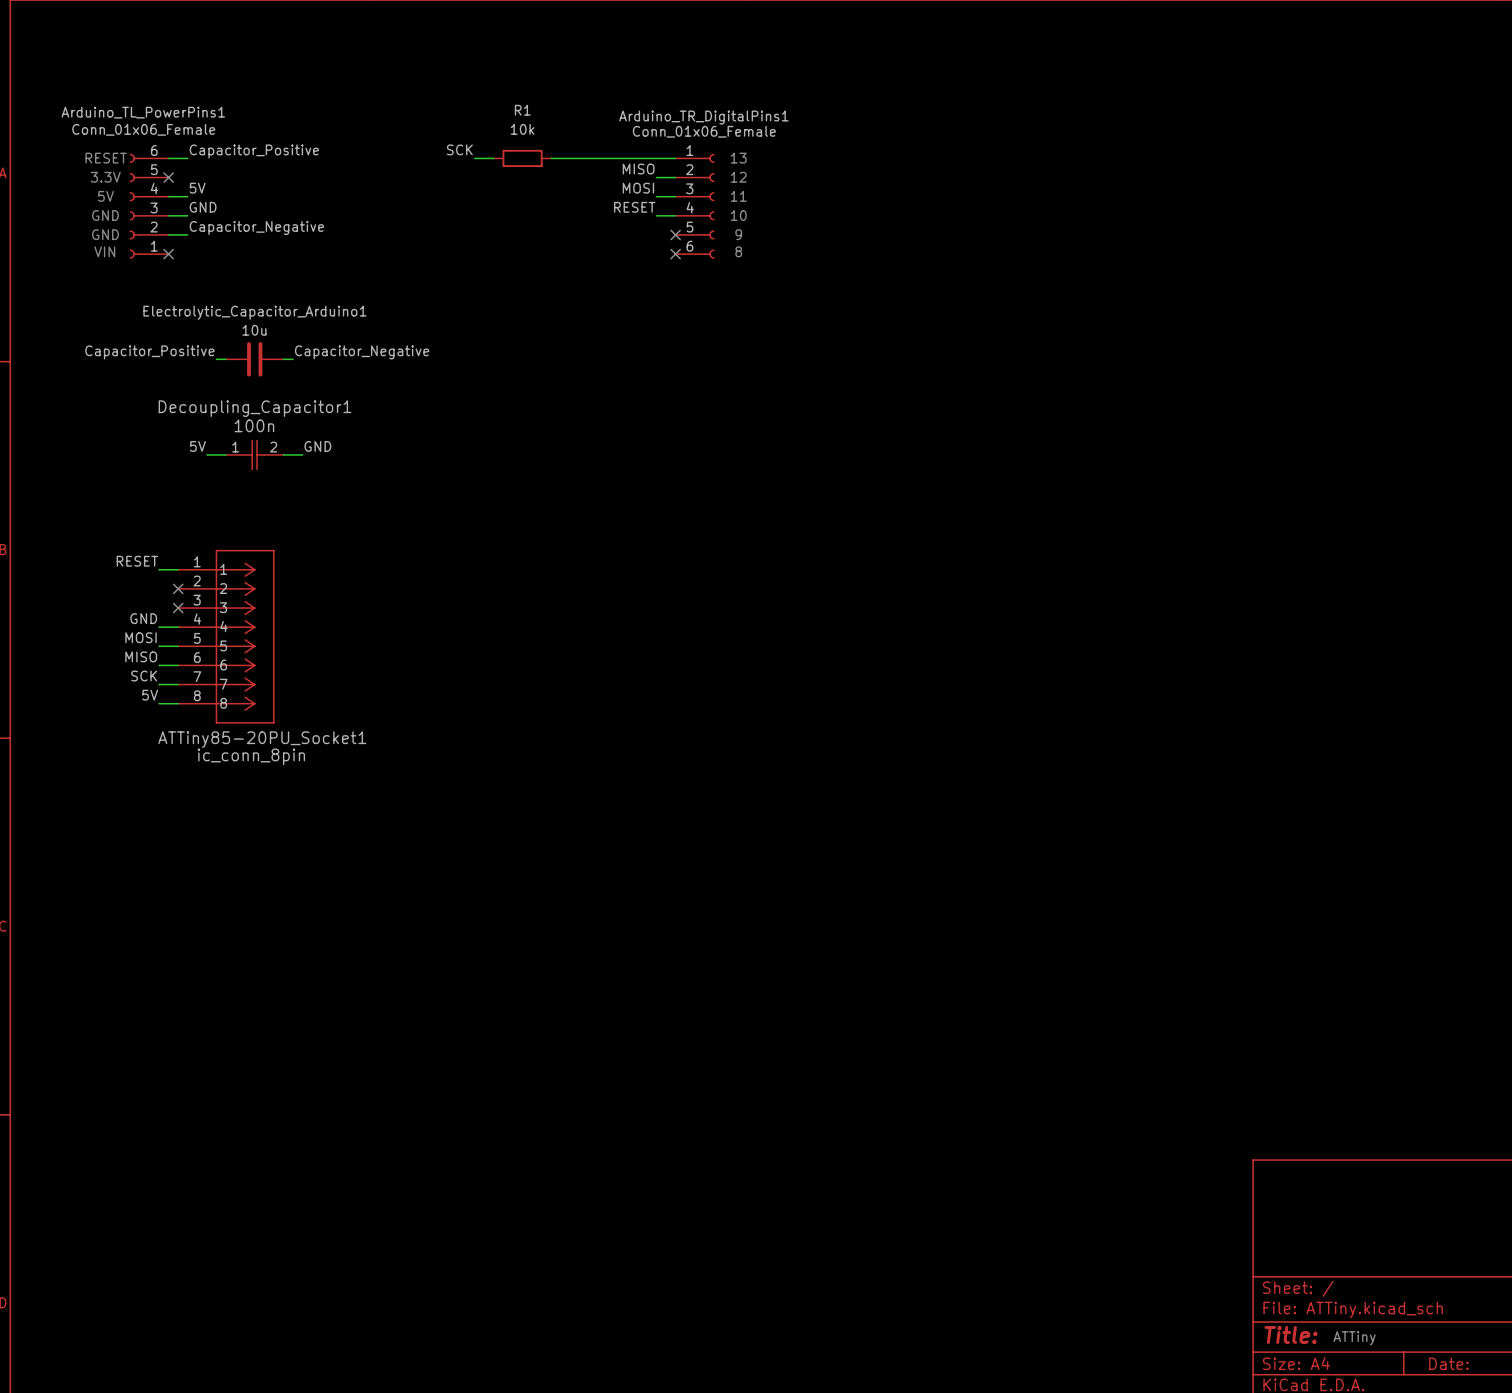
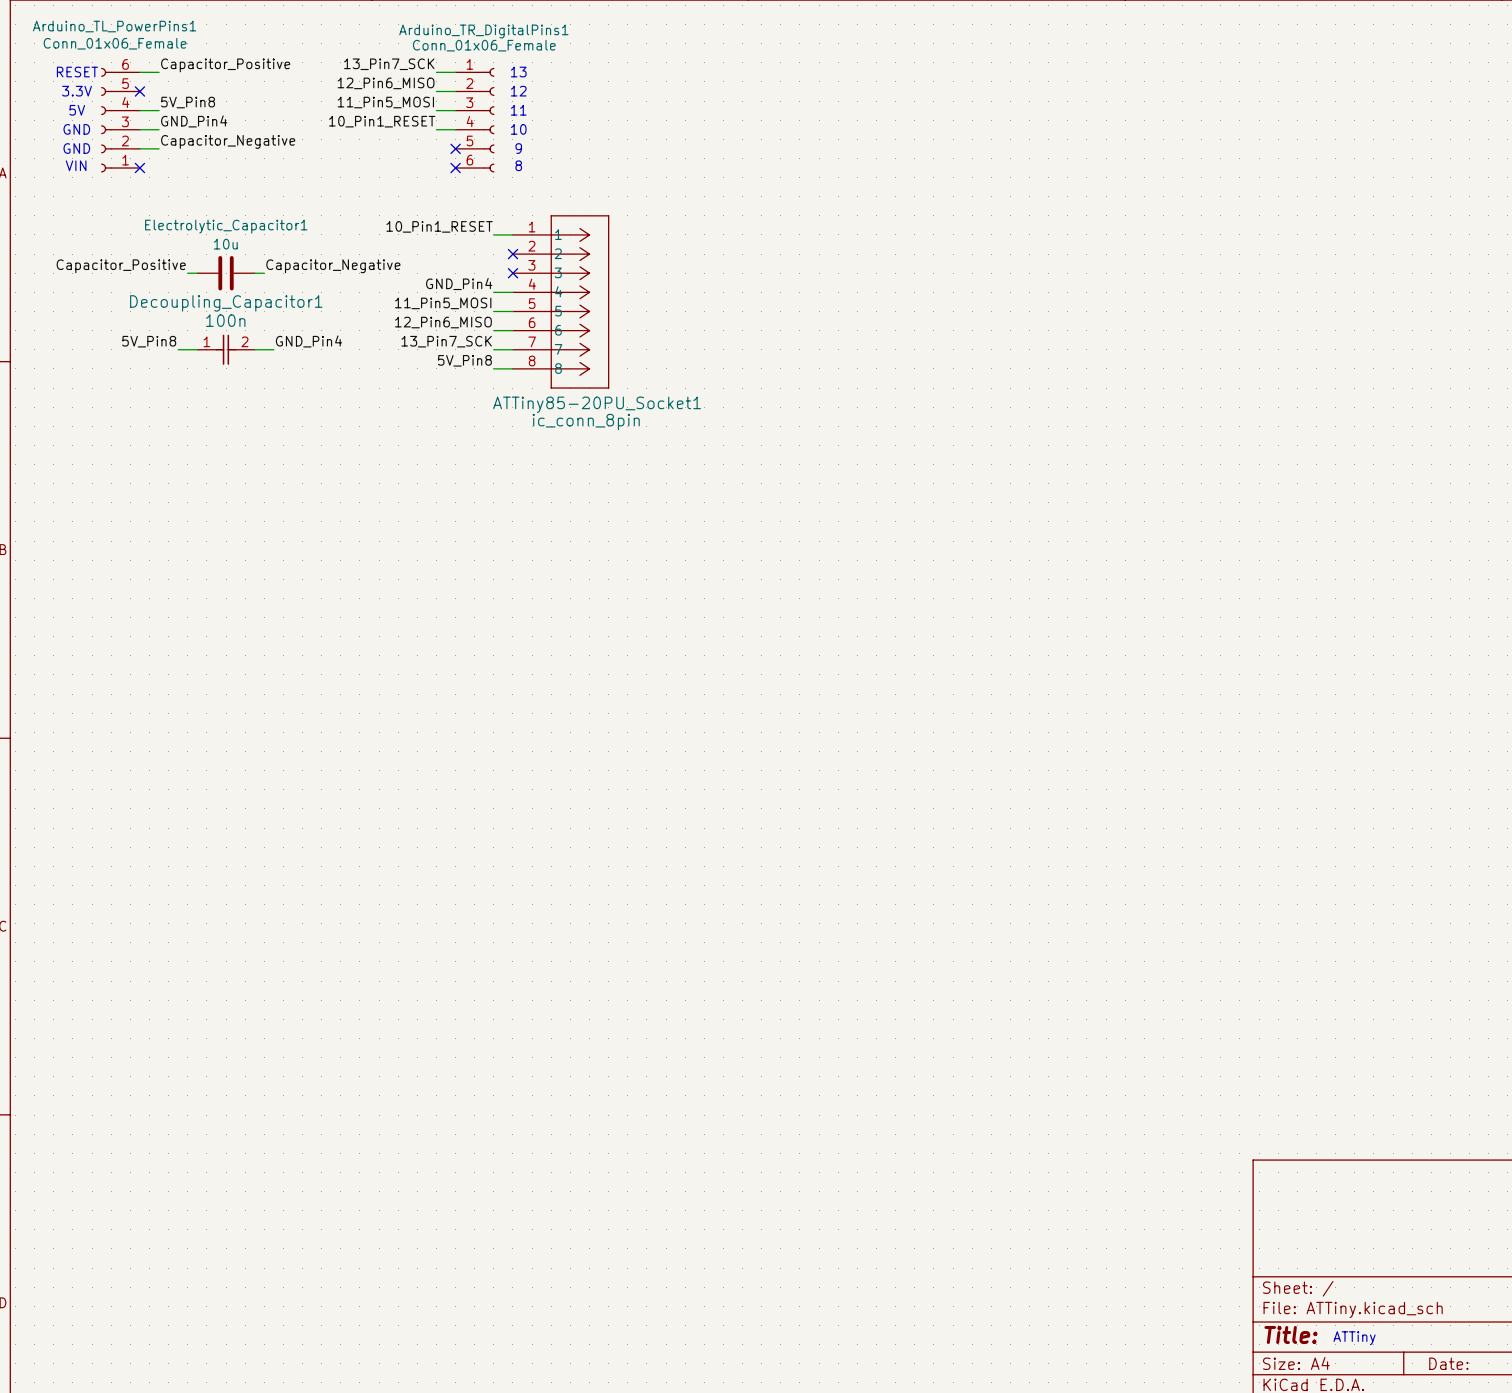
label: none -> 13_Pin7_SCK (389, 64)
label: none -> Capacitor_Positive (225, 65)
wire: none -> (436, 72) (455, 72)
text: none -> 13 (518, 72)
label: none -> 12_Pin6_MISO (386, 83)
no-connect mark: none -> (139, 91)
wire: none -> (436, 91) (455, 91)
text: none -> 12 (518, 91)
label: none -> 5V_Pin8 (188, 102)
label: none -> 11_Pin5_MOSI (385, 102)
wire: none -> (436, 110) (455, 110)
text: none -> 11 (518, 110)
label: none -> GND_Pin4 (194, 121)
label: none -> 10_Pin1_RESET (382, 121)
text: none -> GND (76, 129)
text: none -> 10 (518, 129)
text: none -> GND (76, 148)
no-connect mark: none -> (455, 148)
text: none -> 9 (518, 148)
label: SCK (459, 149) -> none
label: Capacitor_Positive (254, 151) -> Capacitor_Negative (228, 141)
text position: RESET (106, 158) -> RESET (77, 72)
wire: (168, 158) (187, 158) -> (139, 72) (159, 72)
wire: (474, 158) (493, 158) -> (436, 129) (455, 129)
R1: 10k (522, 158) -> none
wire: (551, 158) (675, 158) -> none
text: 13 (738, 158) -> none
text: none -> 8 (518, 165)
no-connect mark: none -> (455, 168)
label: MISO (638, 169) -> none
text position: 3.3V (105, 177) -> 3.3V (77, 91)
no-connect mark position: (168, 177) -> (139, 168)
wire: (656, 177) (675, 177) -> none
text: 12 (738, 177) -> none
label: 5V (197, 188) -> none
label: MOSI (638, 188) -> none
text position: 5V (105, 196) -> 5V (77, 110)
wire: (168, 196) (187, 196) -> (139, 110) (159, 110)
wire: (656, 196) (675, 196) -> none
text: 11 (738, 196) -> none
Arduino_TL_PowerPins1 position: (149, 206) -> (120, 120)
Arduino_TR_DigitalPins1 position: (695, 206) -> (475, 120)
label: GND (203, 207) -> none
label: RESET (634, 207) -> none
text: GND (105, 215) -> none
wire: (168, 215) (187, 215) -> (139, 129) (159, 129)
wire: (656, 215) (675, 215) -> (493, 234) (512, 234)
text: 10 (738, 215) -> none
label: none -> 10_Pin1_RESET (439, 226)
label: Capacitor_Negative (256, 228) -> none
text: GND (105, 234) -> none
wire: (168, 234) (187, 234) -> (139, 148) (159, 148)
no-connect mark: (675, 234) -> none
text: 9 (738, 234) -> none
text position: VIN (104, 251) -> VIN (76, 165)
text: 8 (738, 251) -> none
no-connect mark: (168, 254) -> none
no-connect mark: none -> (512, 254)
no-connect mark: (675, 254) -> none
label: none -> Capacitor_Positive (121, 266)
label: none -> Capacitor_Negative (333, 266)
Electrolytic_Capacitor1: none -> 10u (226, 273)
no-connect mark: none -> (512, 273)
label: none -> GND_Pin4 (459, 284)
wire: none -> (493, 292) (512, 292)
label: none -> 11_Pin5_MOSI (443, 303)
wire: none -> (493, 311) (512, 311)
label: none -> 12_Pin6_MISO (443, 322)
wire: none -> (493, 330) (512, 330)
label: none -> 5V_Pin8 (149, 341)
label: none -> GND_Pin4 (309, 341)
label: none -> 13_Pin7_SCK (446, 341)
wire: none -> (493, 349) (512, 349)
label: Capacitor_Positive (149, 352) -> none
label: Capacitor_Negative (362, 352) -> none
wire: (216, 359) (226, 359) -> (187, 273) (197, 273)
Electrolytic_Capacitor_Arduino1: 10u (254, 359) -> none
wire: (283, 359) (292, 359) -> (254, 273) (264, 273)
label: none -> 5V_Pin8 (464, 360)
wire: none -> (493, 368) (512, 368)
label: 5V (197, 446) -> none
label: GND (317, 446) -> none
wire: (206, 454) (226, 454) -> (178, 349) (197, 349)
Decoupling_Capacitor1 position: (254, 454) -> (226, 349)
wire: (283, 454) (302, 454) -> (254, 349) (273, 349)
label: RESET (137, 561) -> none
wire: (159, 569) (178, 569) -> none
no-connect mark: (178, 588) -> none
no-connect mark: (178, 608) -> none
label: GND (143, 618) -> none
wire: (159, 627) (178, 627) -> none
ATTiny85-20PU_Socket1 position: (226, 636) -> (561, 301)
label: MOSI (140, 637) -> none
wire: (159, 646) (178, 646) -> none
label: MISO (141, 656) -> none
wire: (159, 665) (178, 665) -> none
label: SCK (144, 676) -> none
wire: (159, 684) (178, 684) -> none
label: 5V (150, 695) -> none
wire: (159, 703) (178, 703) -> none

